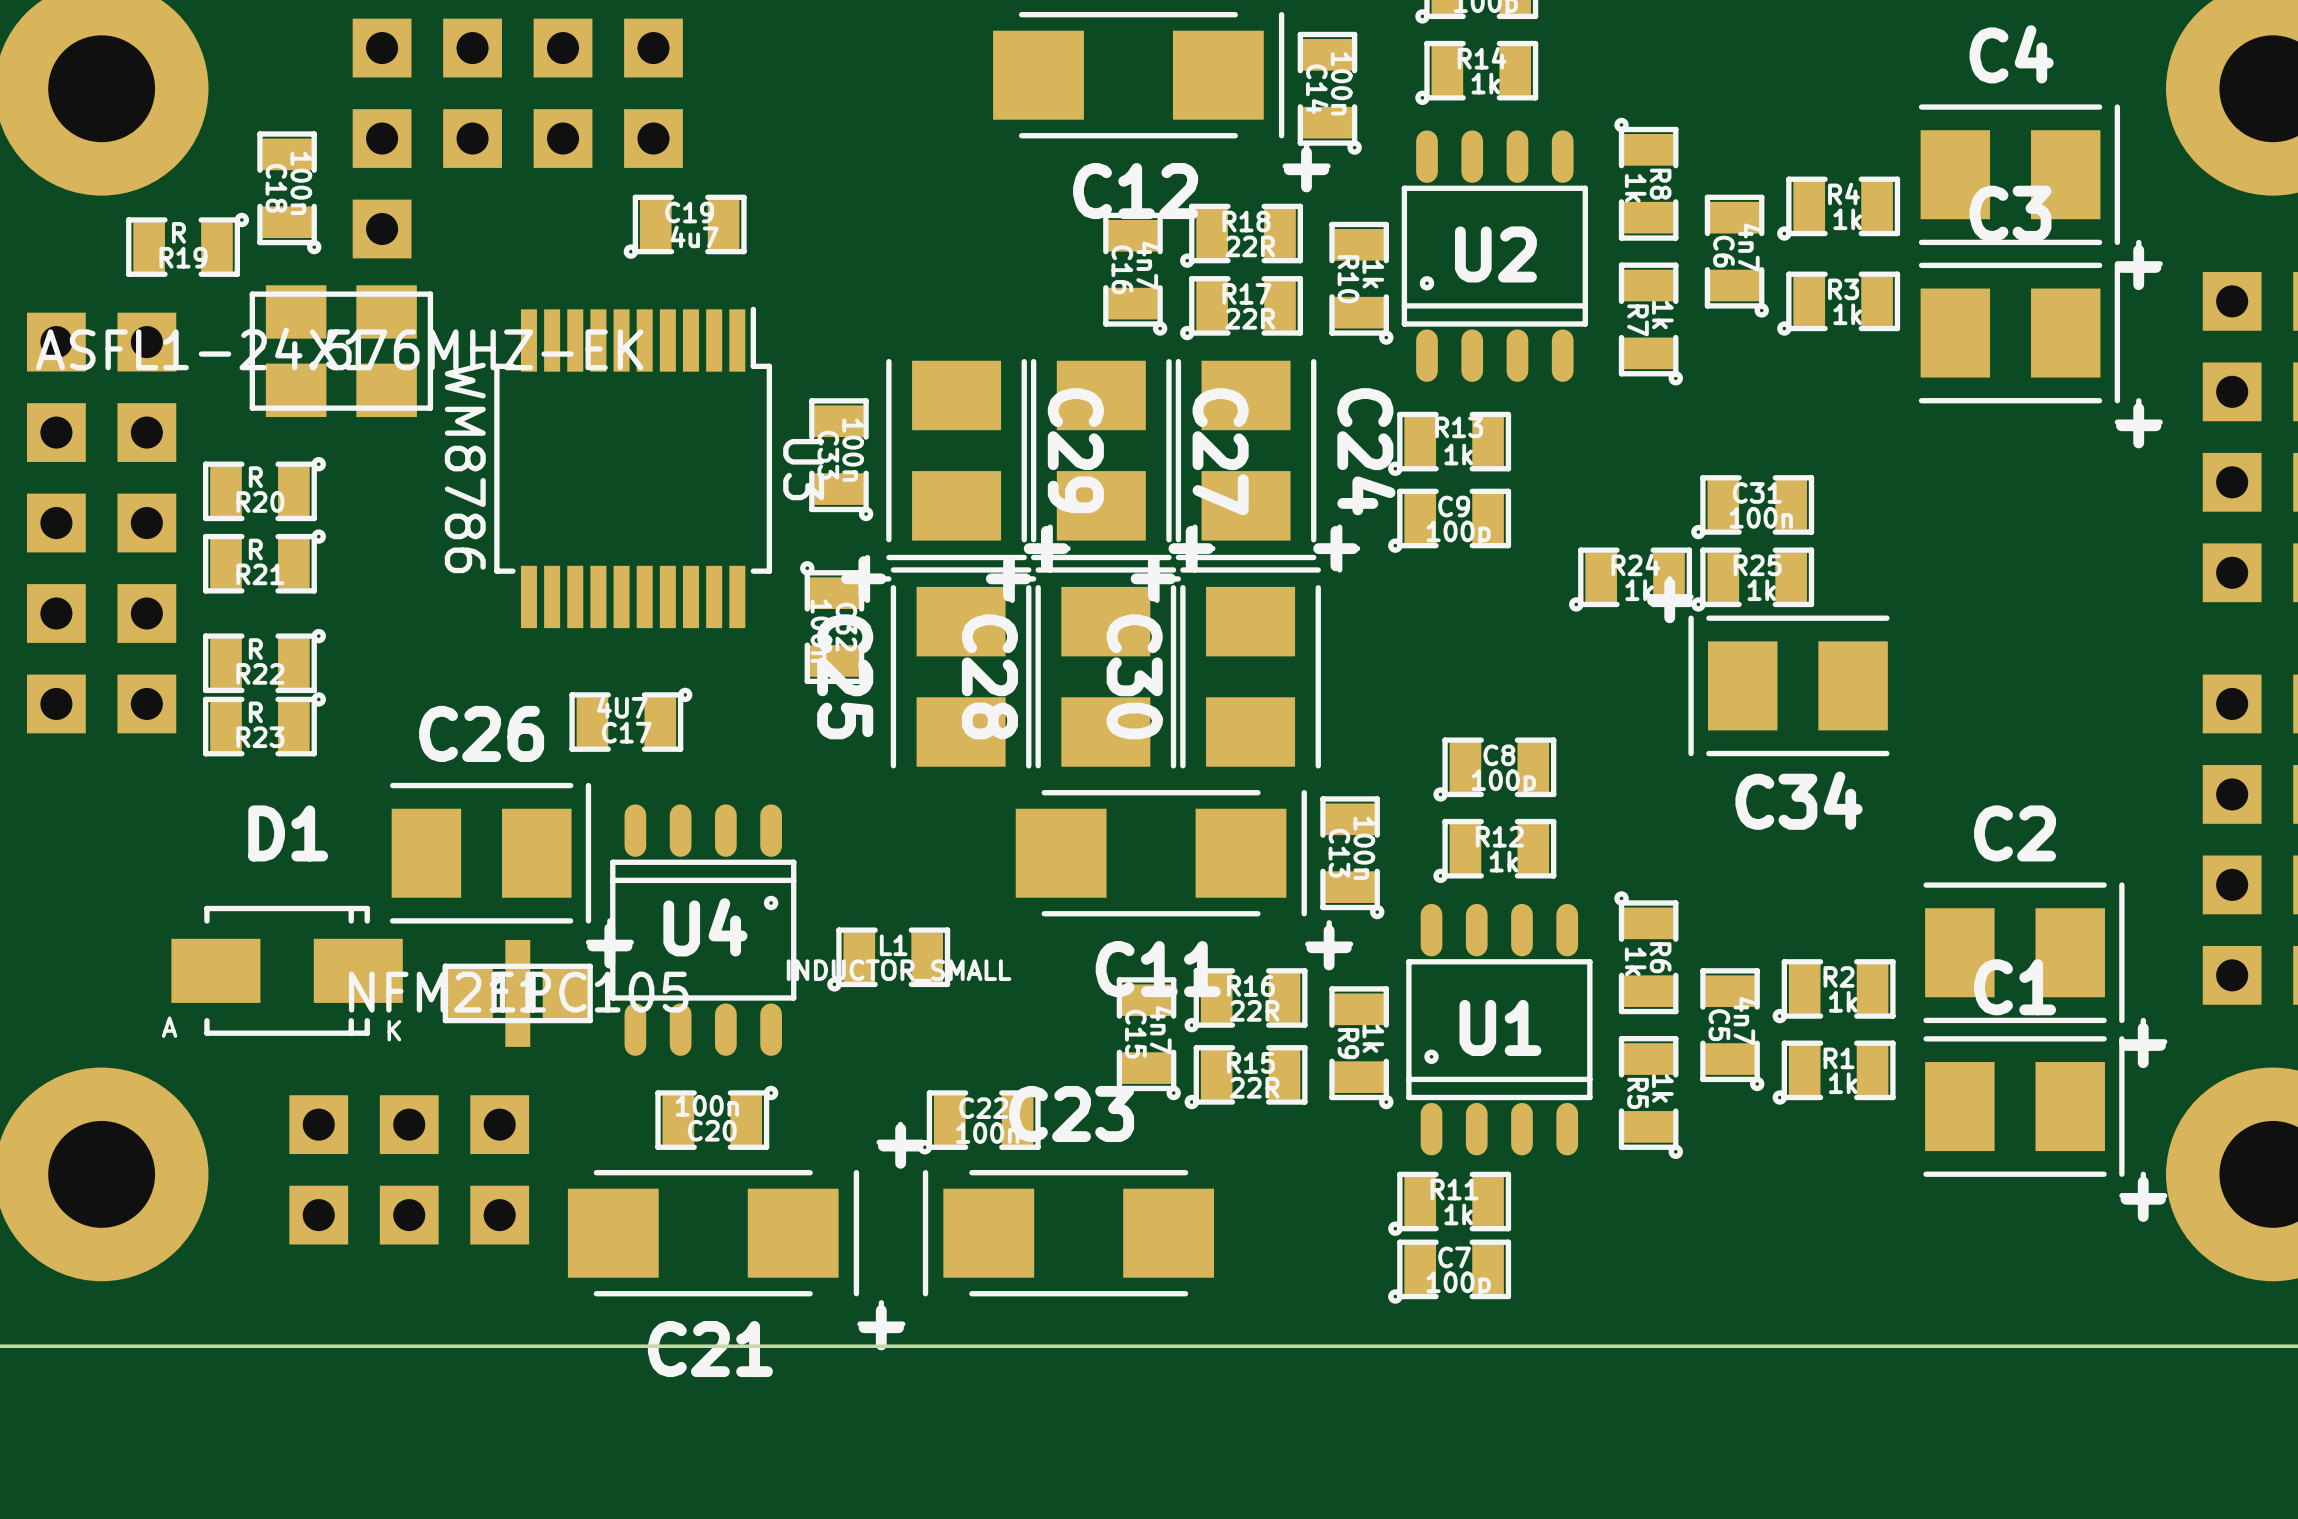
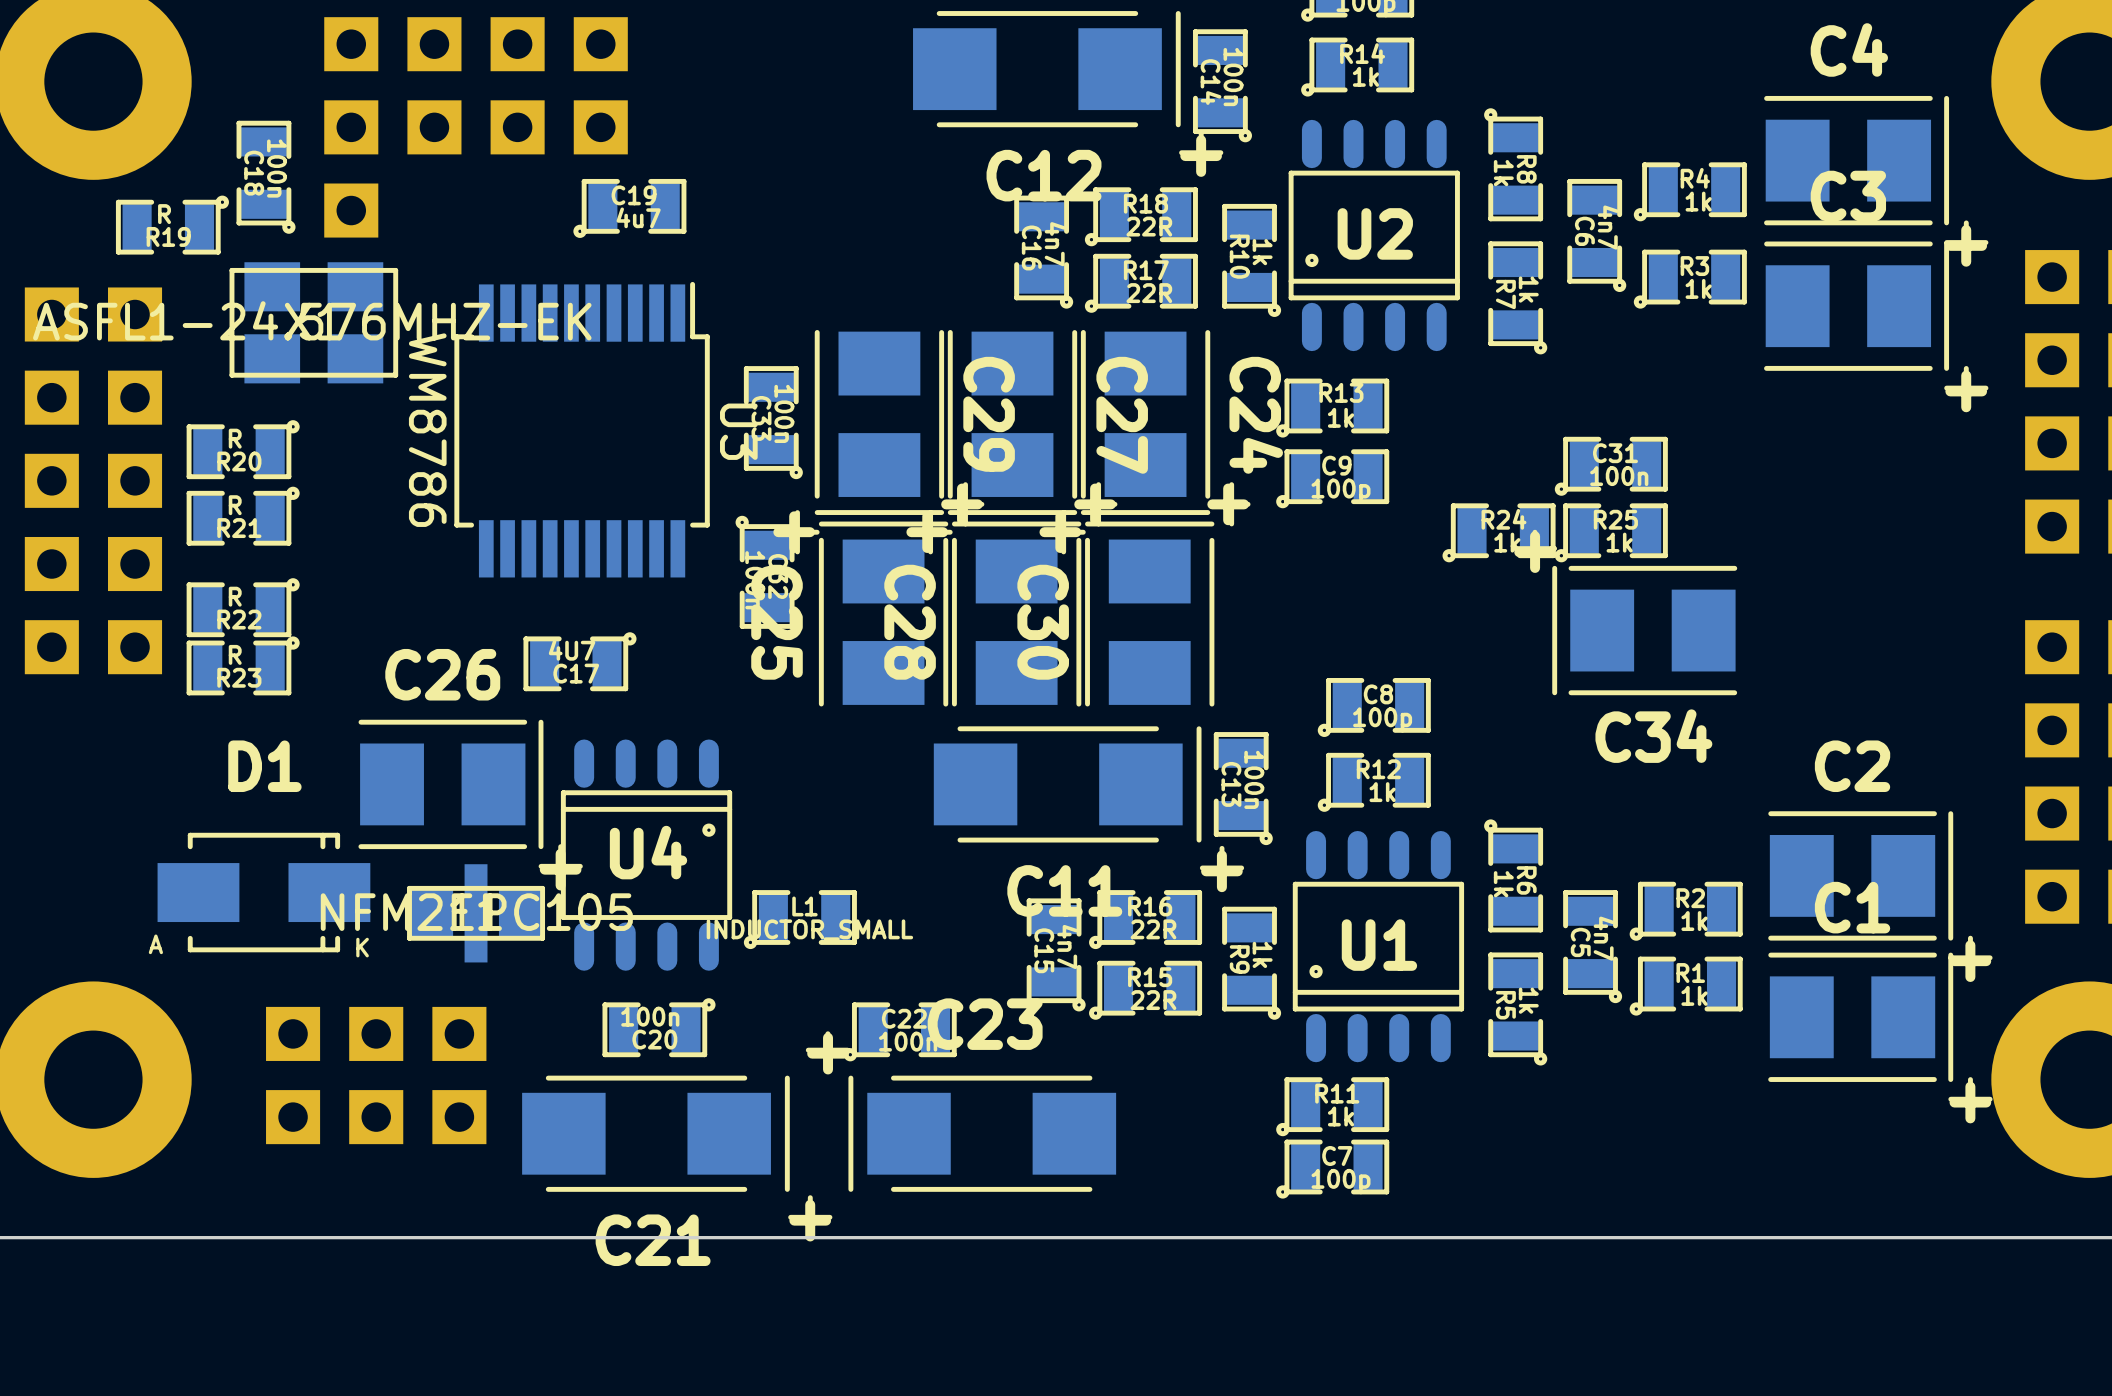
L1 position: (888, 959) -> (800, 919)

